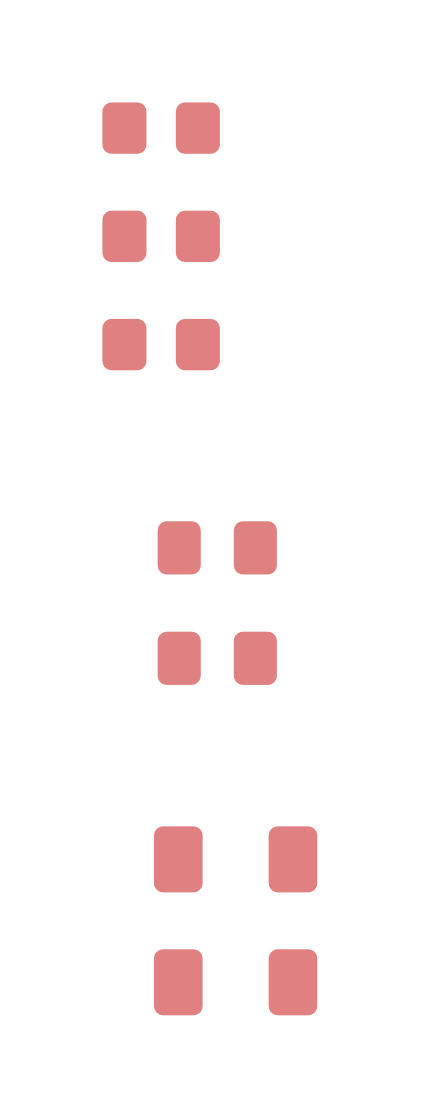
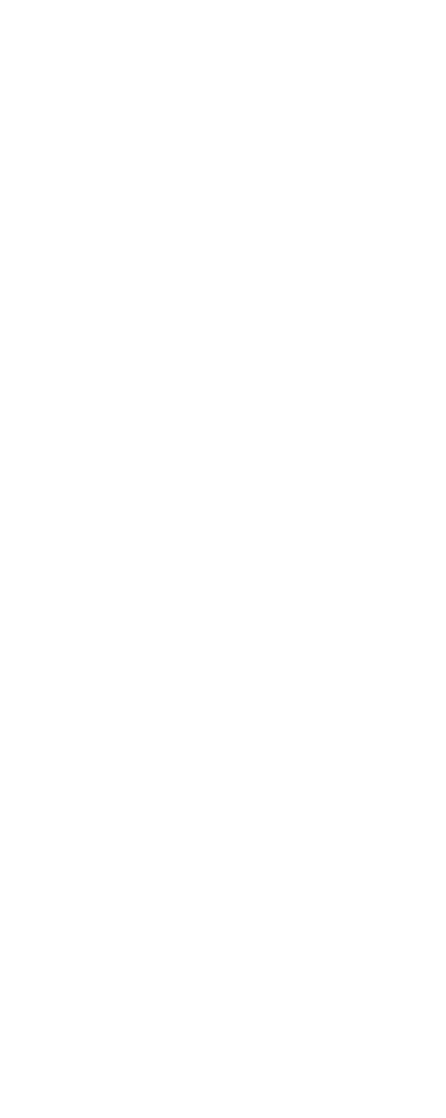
part: (161, 128) -> none
part: (161, 236) -> none
part: (161, 344) -> none
part: (217, 547) -> none
part: (217, 658) -> none
part: (235, 859) -> none
part: (235, 982) -> none

